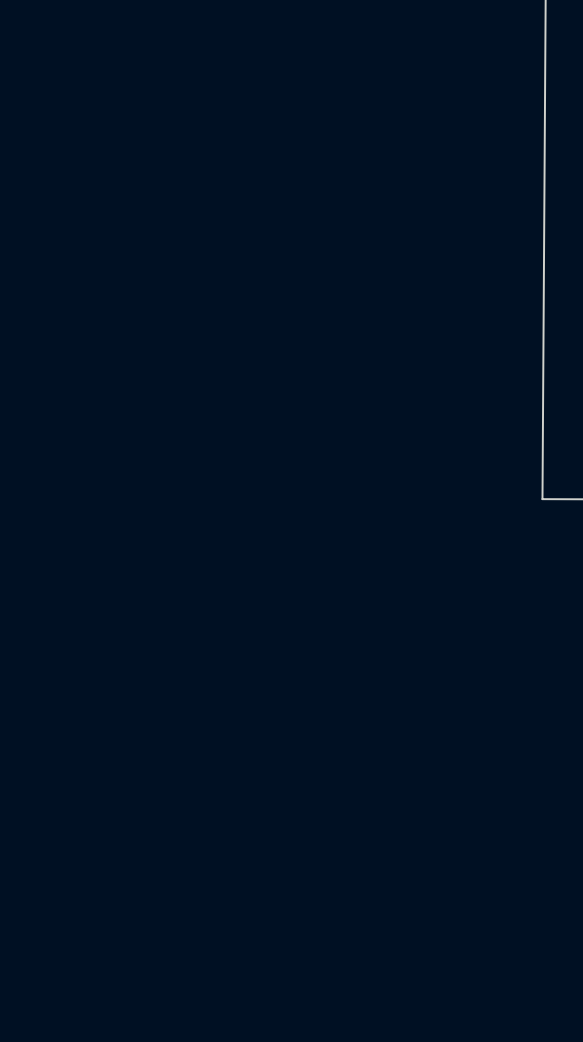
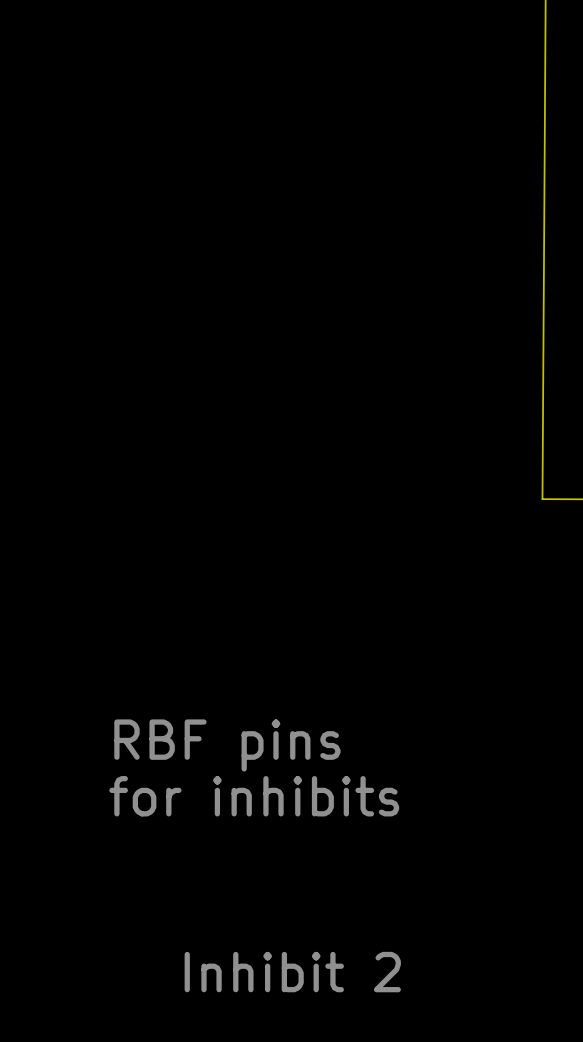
text: none -> RBF pins (227, 745)
text: none -> for inhibits (254, 796)
text: none -> Inhibit 2 (292, 972)

